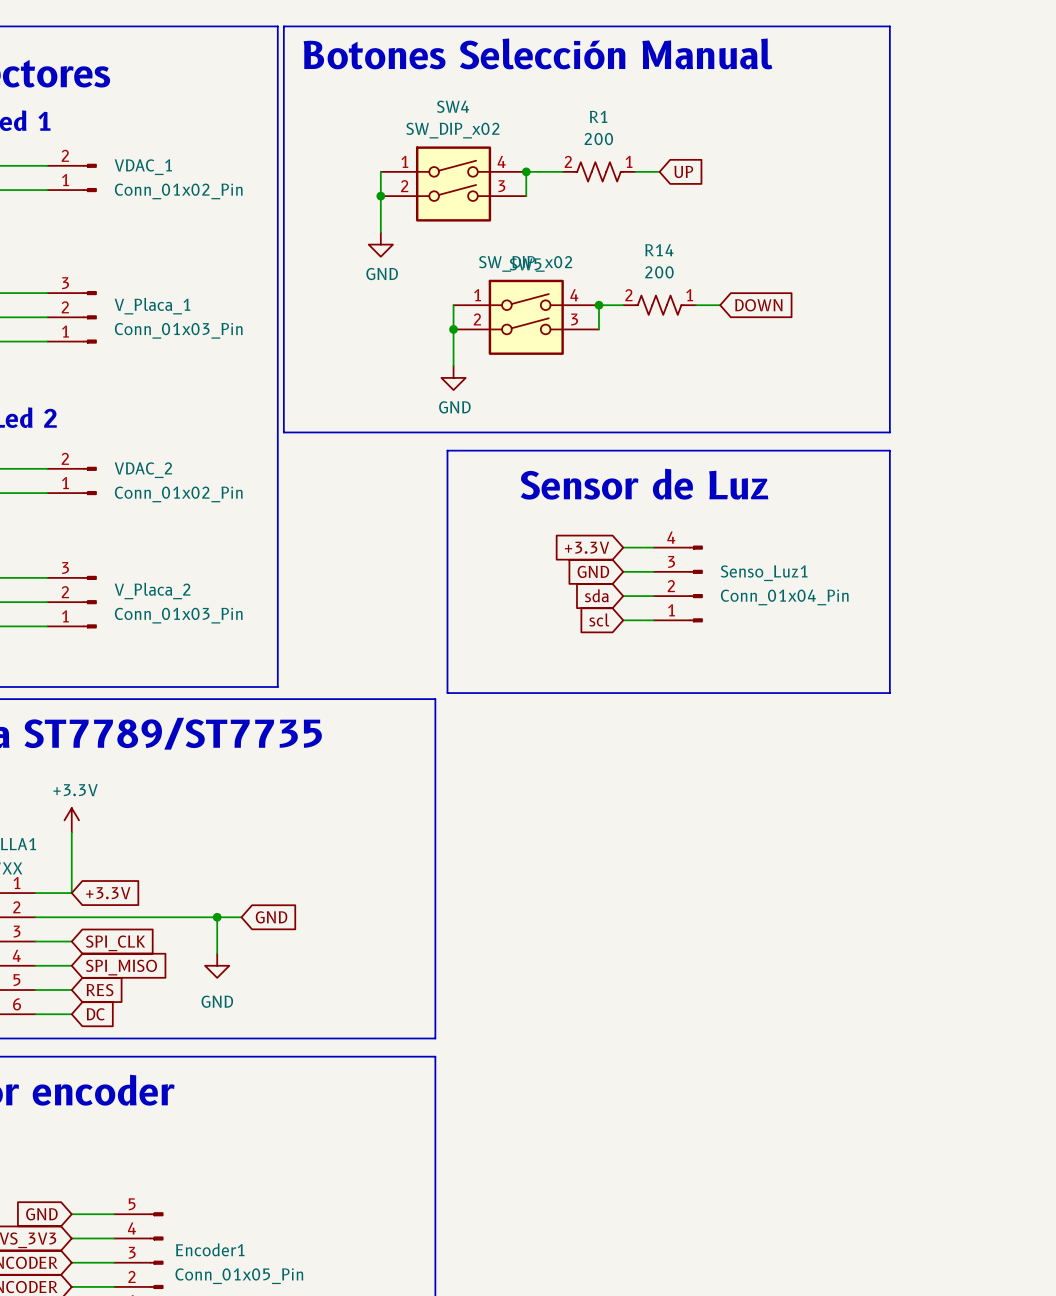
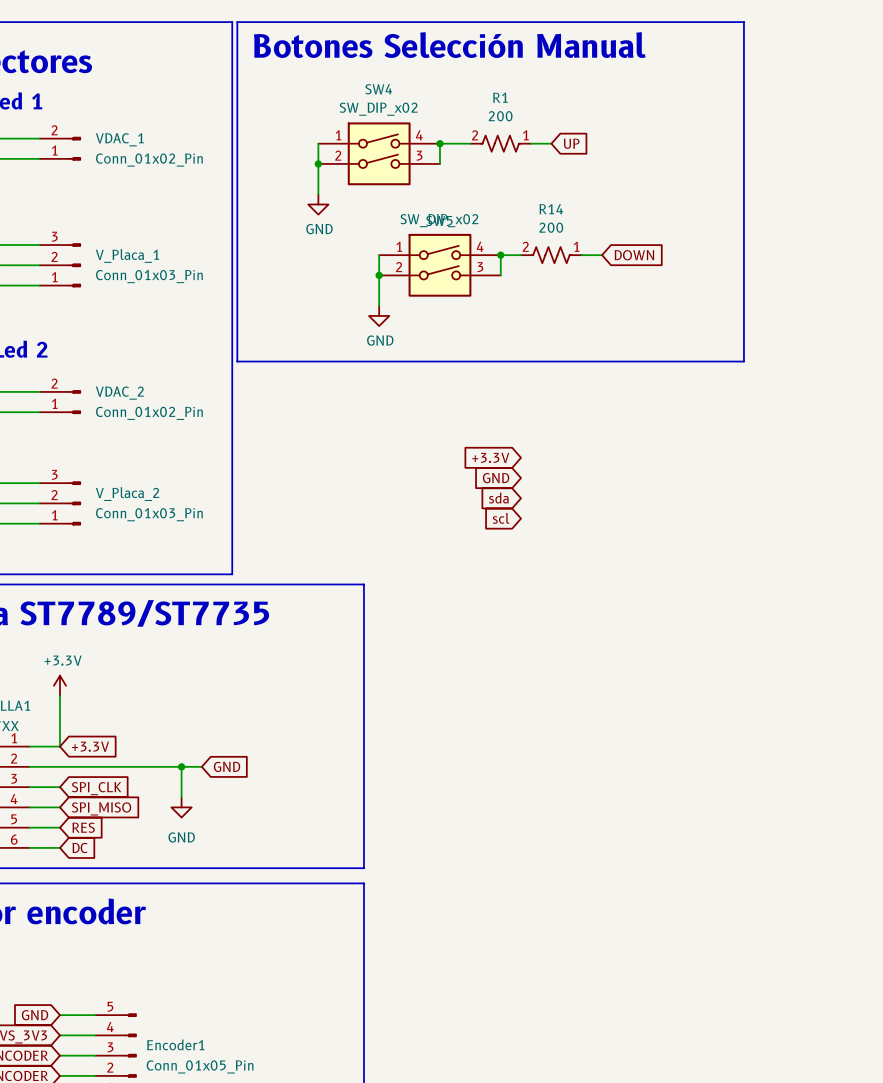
line: (447, 450) (889, 450) (889, 693) (447, 693) (447, 450) -> none
text: Sensor de Luz (644, 484) -> none
wire: (623, 547) (653, 547) -> none
wire: (623, 571) (653, 571) -> none
Senso_Luz1: Conn_01x04_Pin (678, 583) -> none
wire: (623, 596) (653, 596) -> none
wire: (623, 620) (653, 620) -> none

